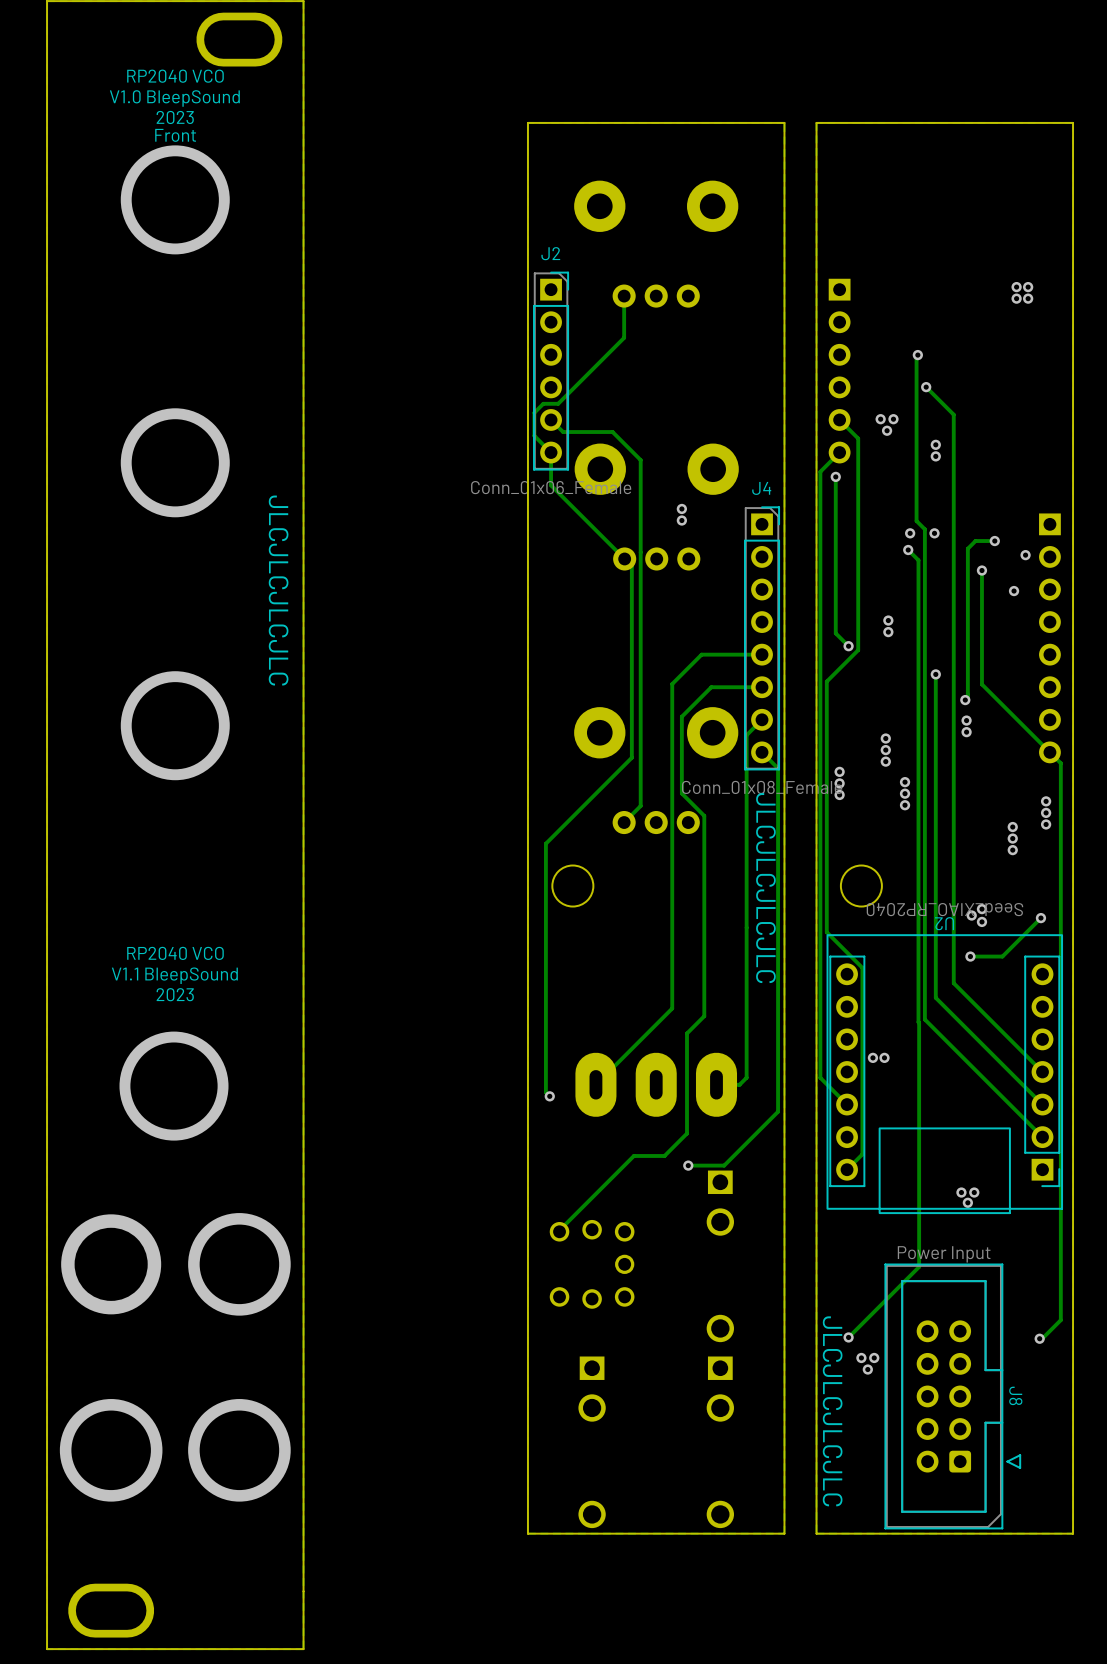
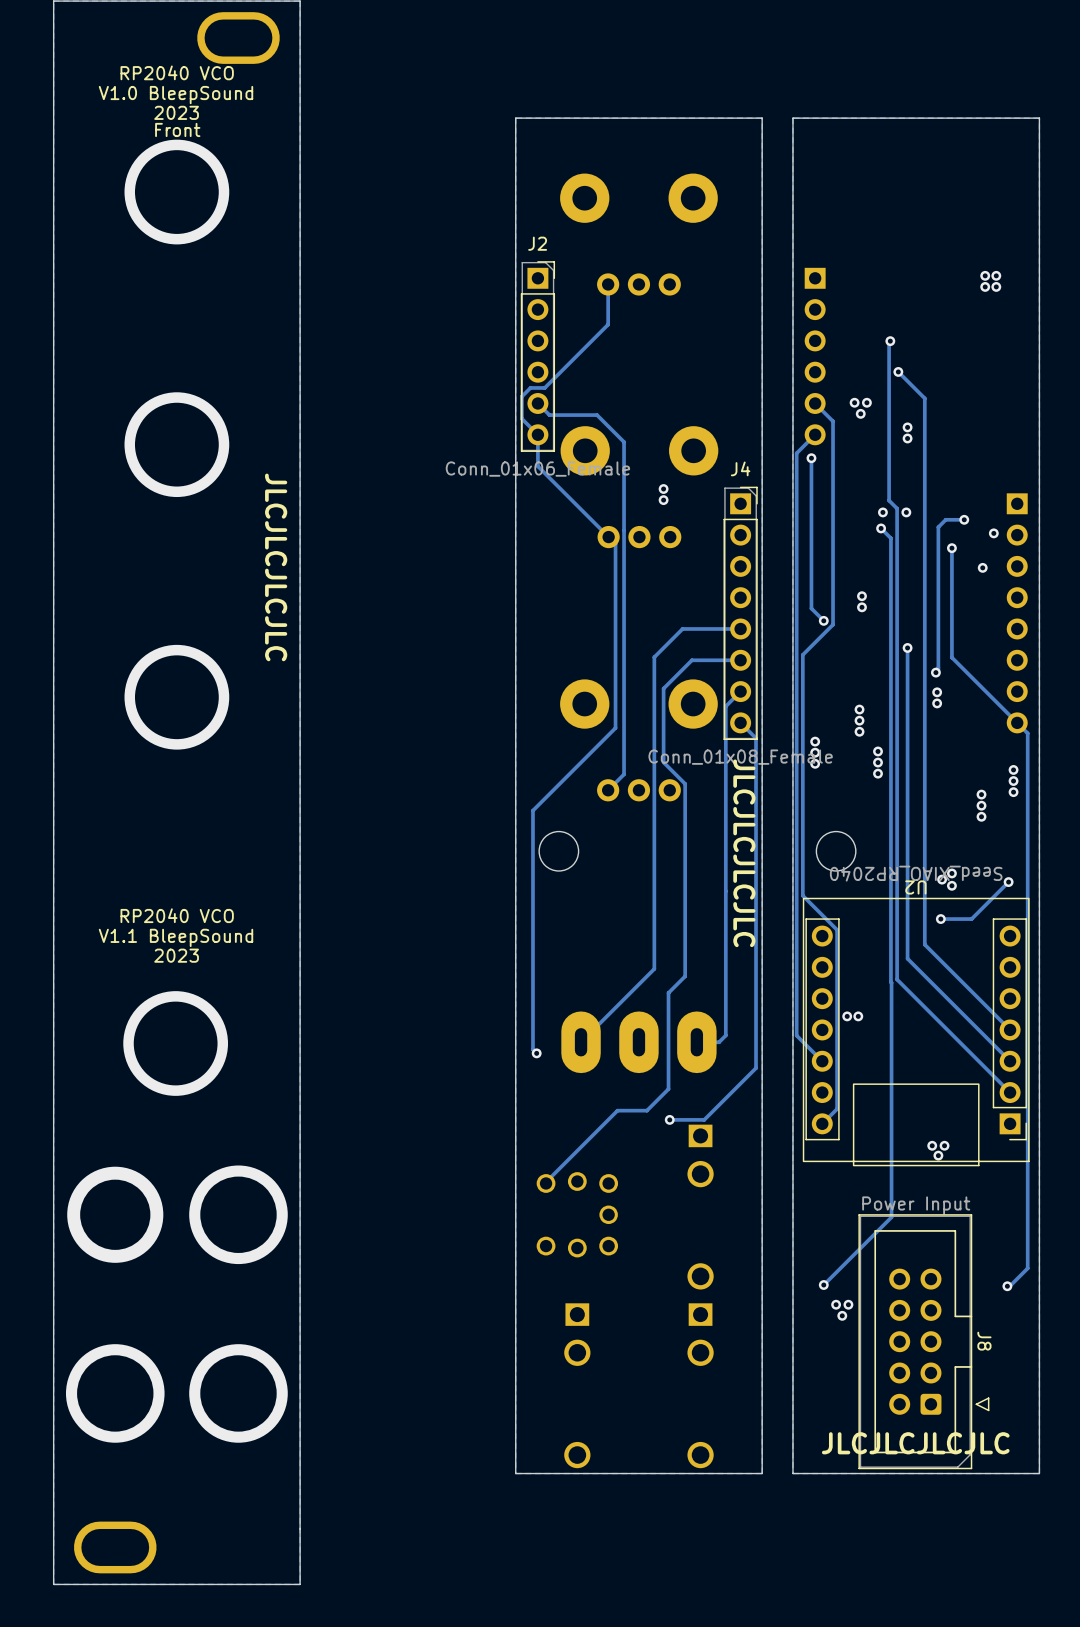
text rotation: 0° (832, 1411) -> 90° counterclockwise (915, 1443)

